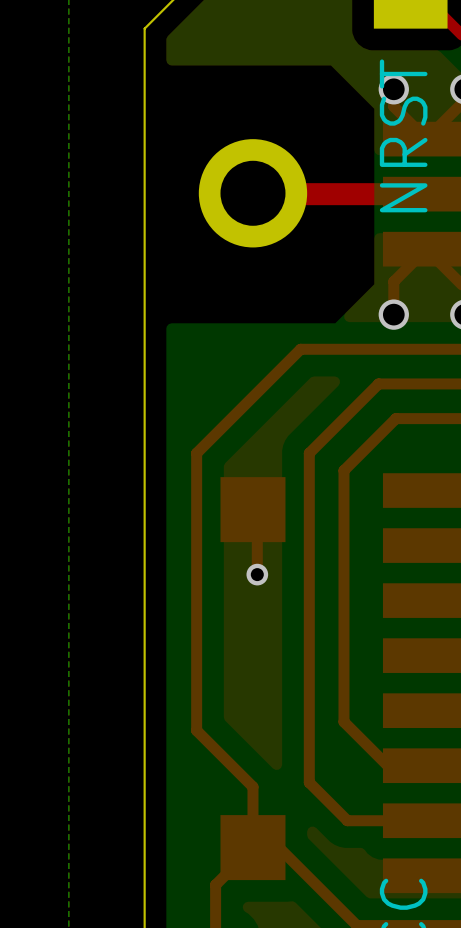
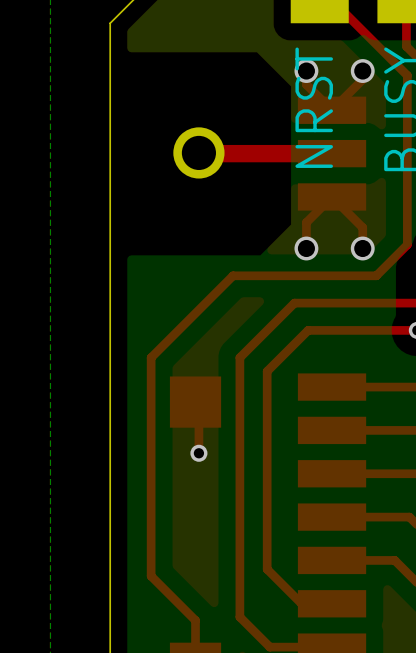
part footprint: [198, 139, 308, 248] -> [173, 127, 225, 179]

